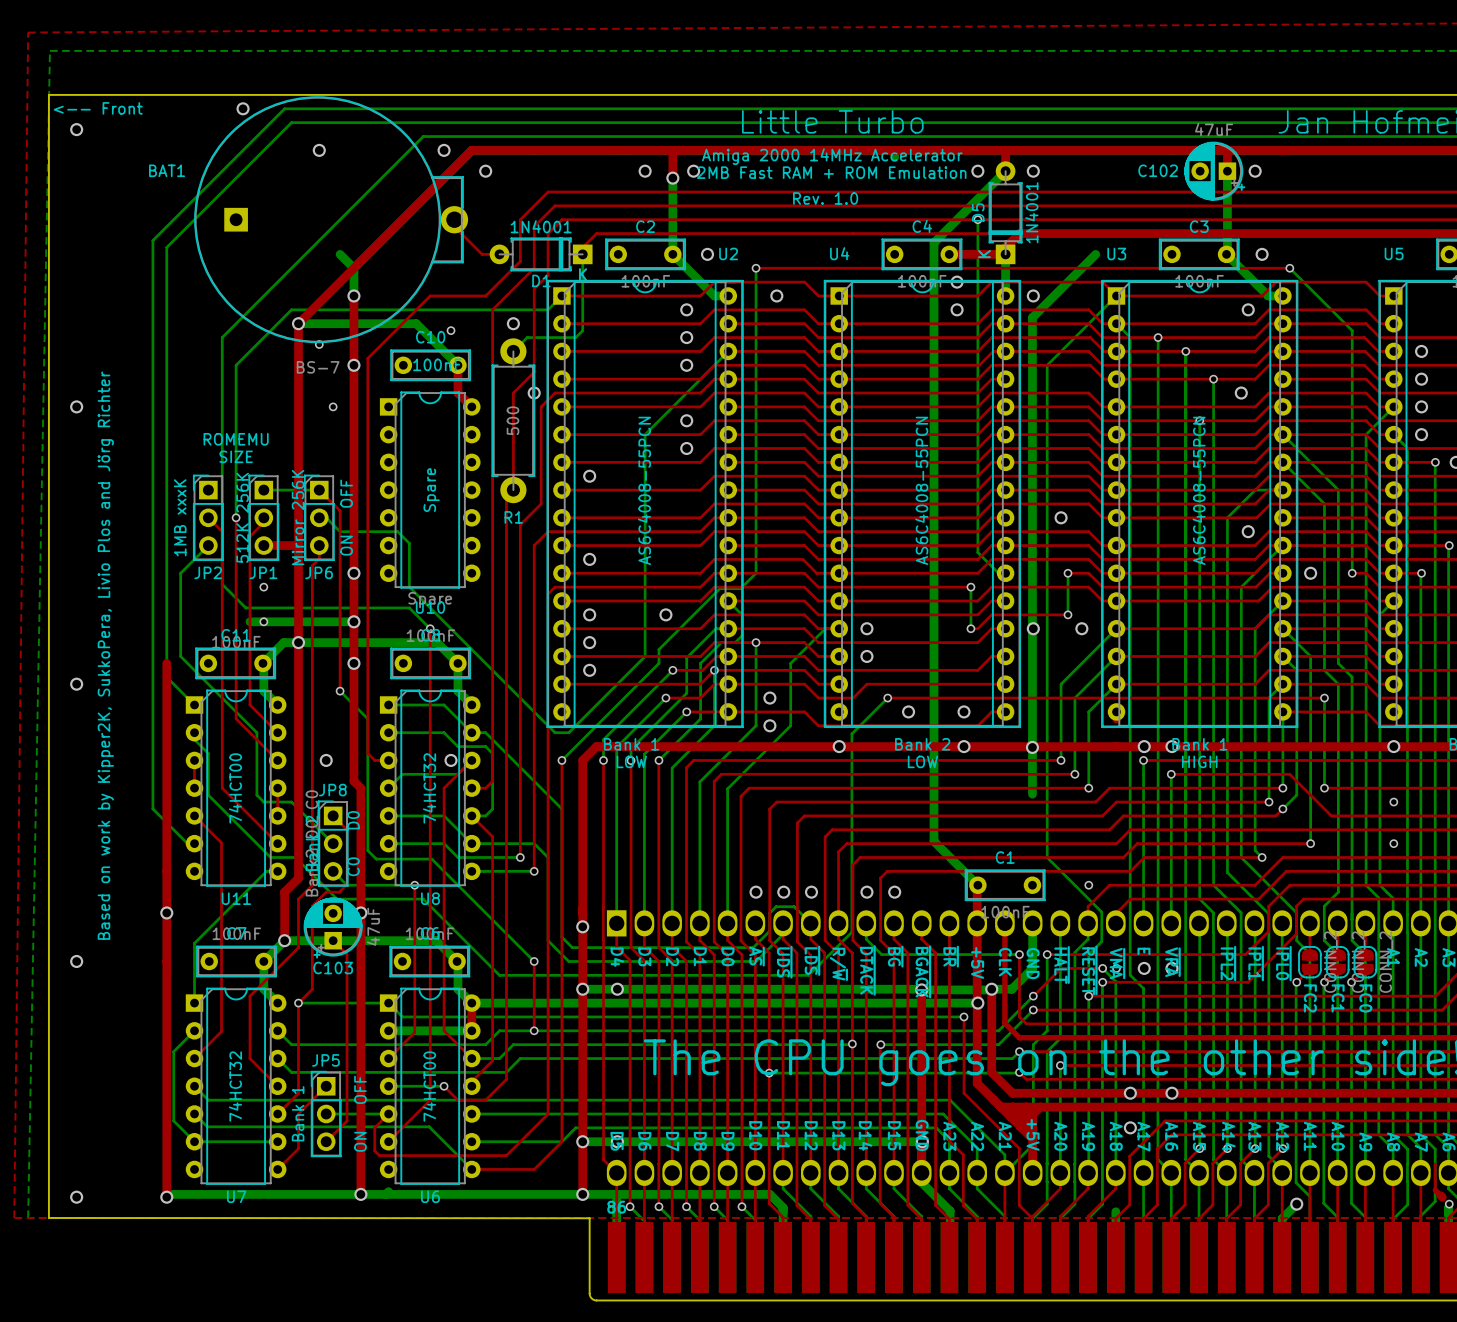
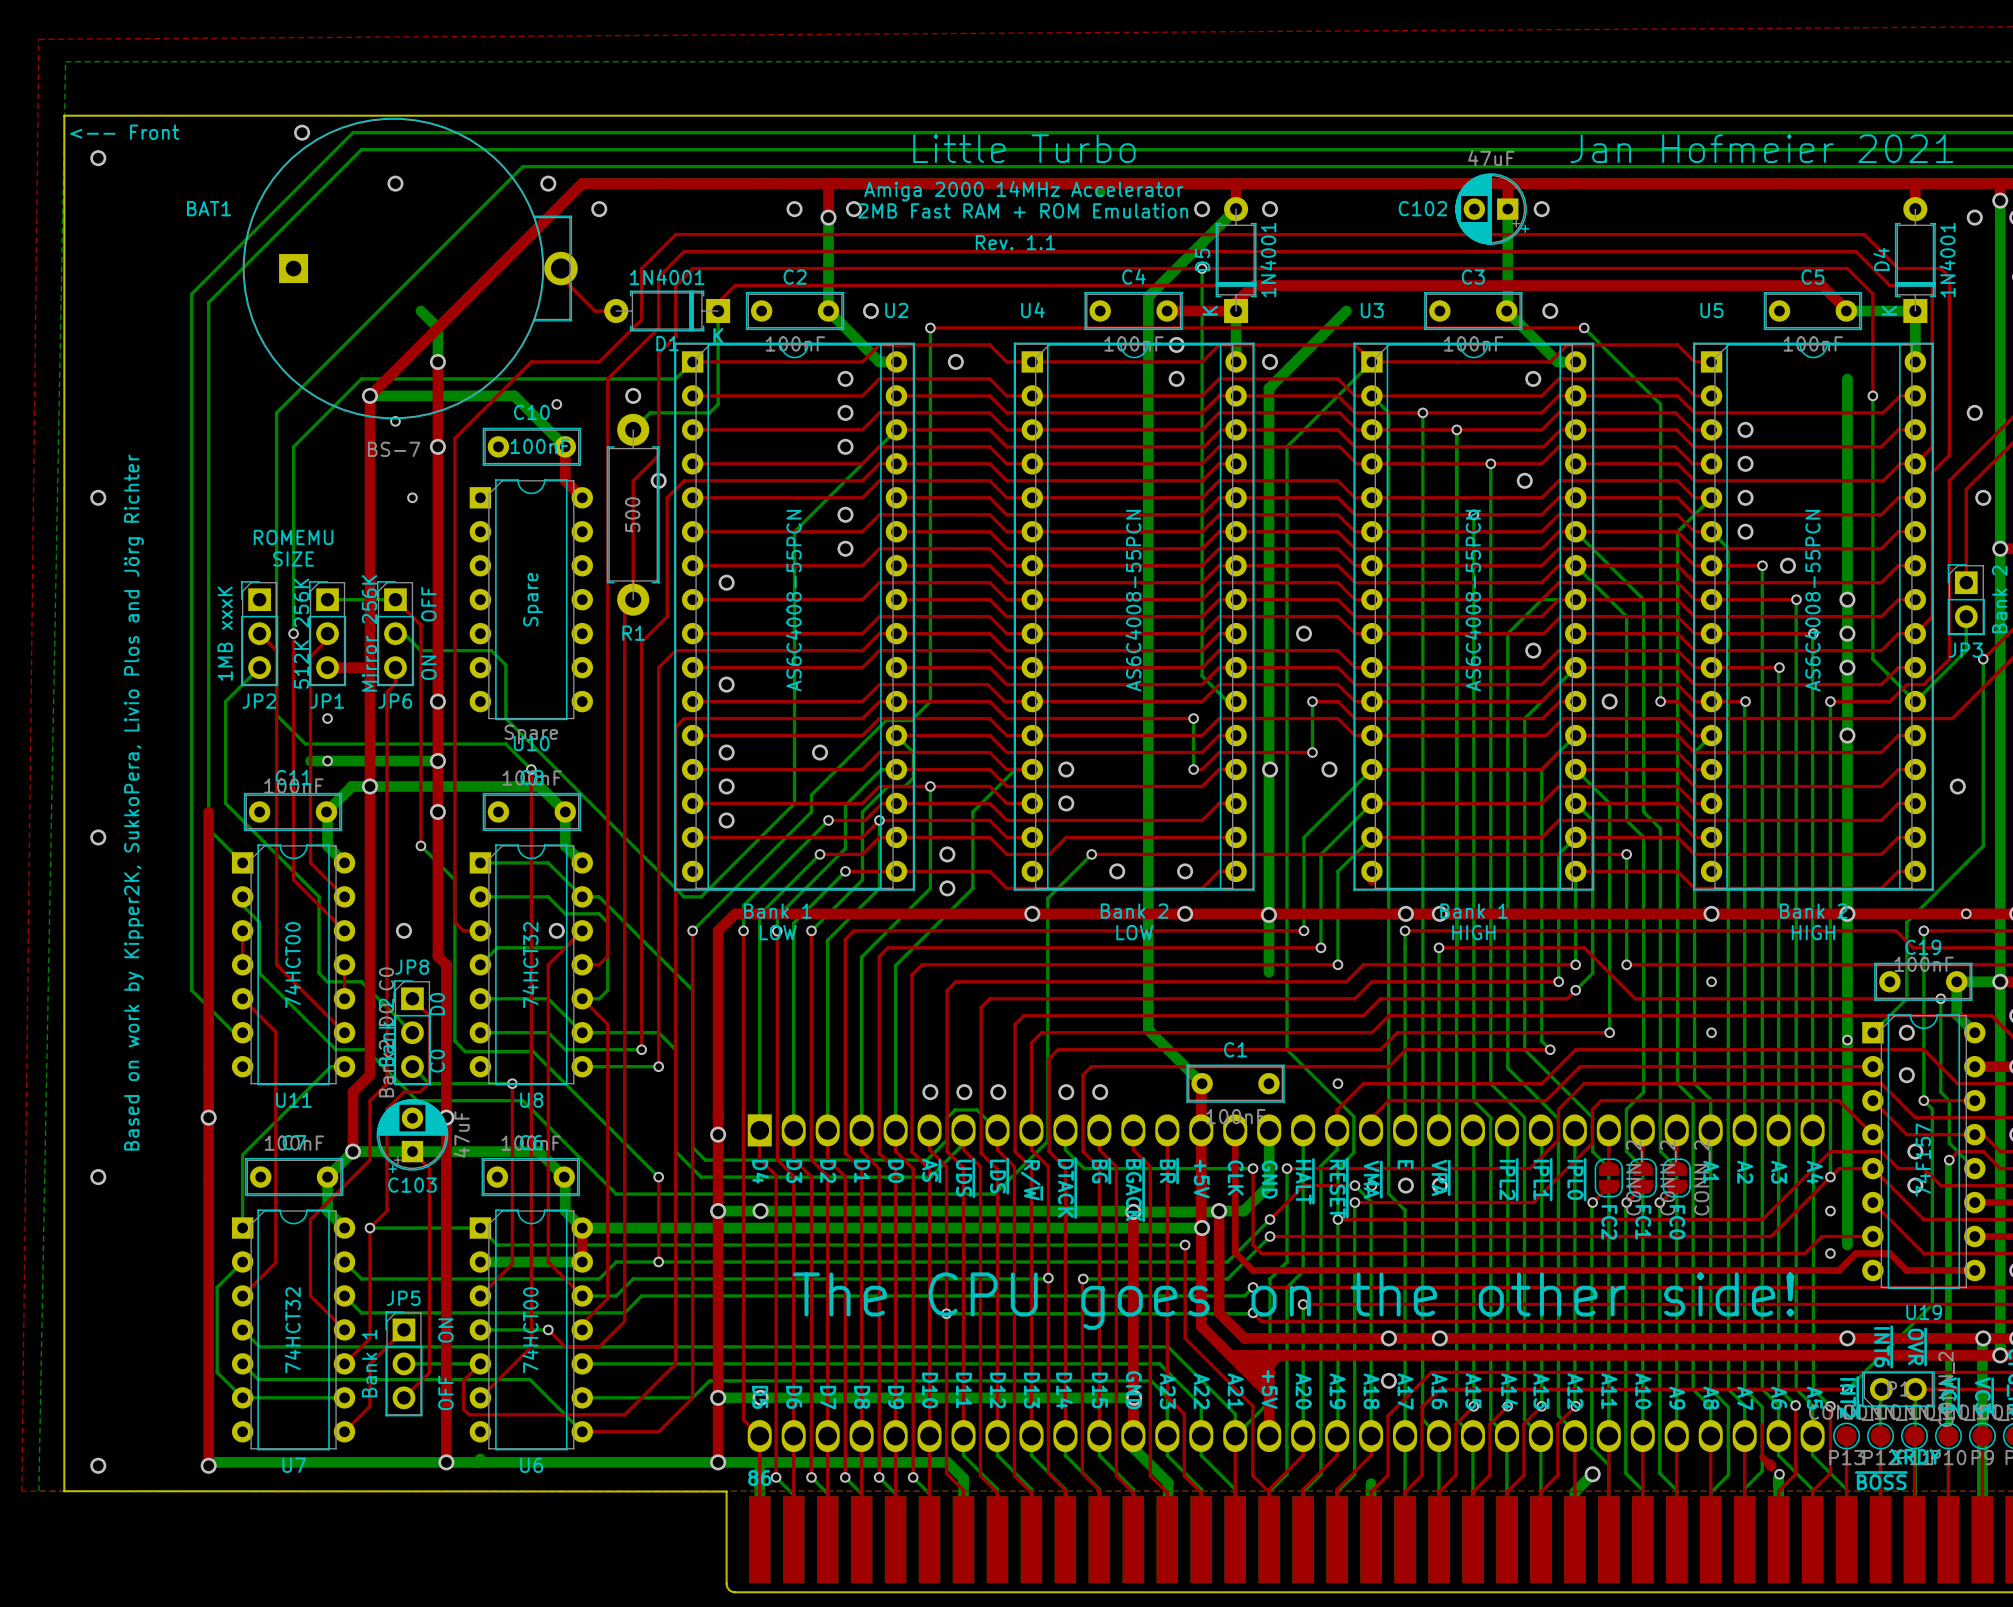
text: Rev. 1.0 (825, 198) -> Rev. 1.1 (1015, 242)
text: ON OFF (360, 1113) -> OFF ON (445, 1364)

